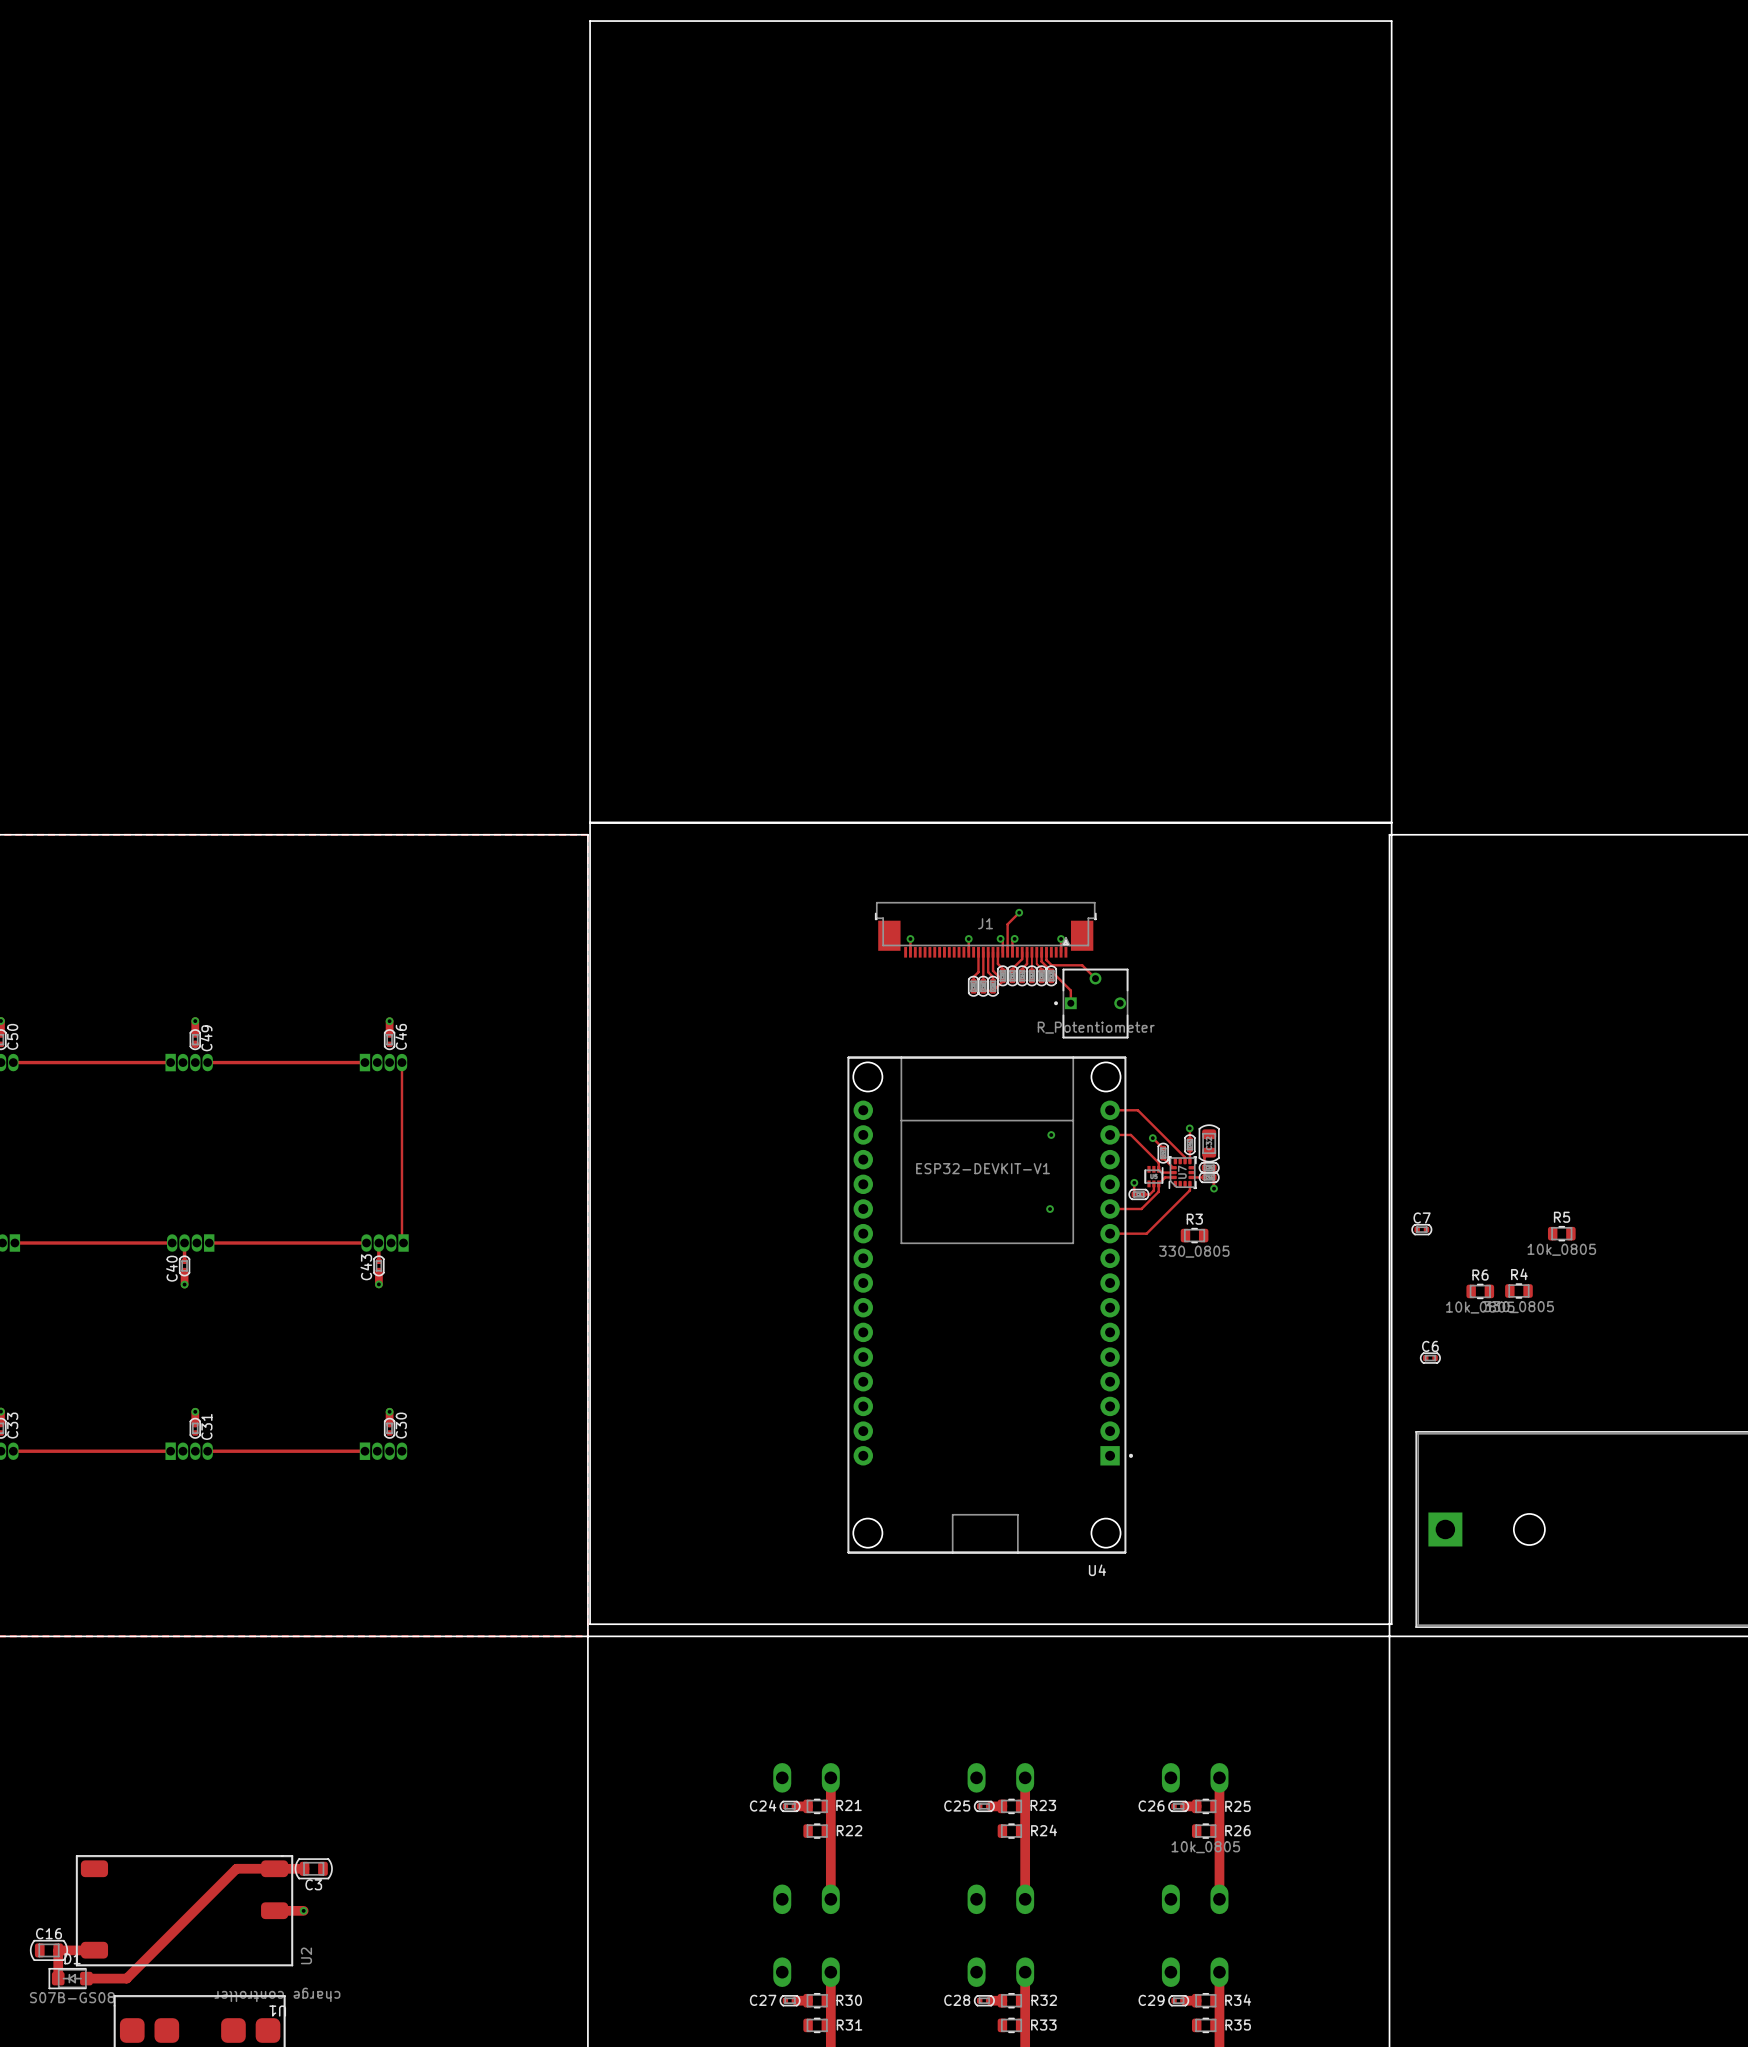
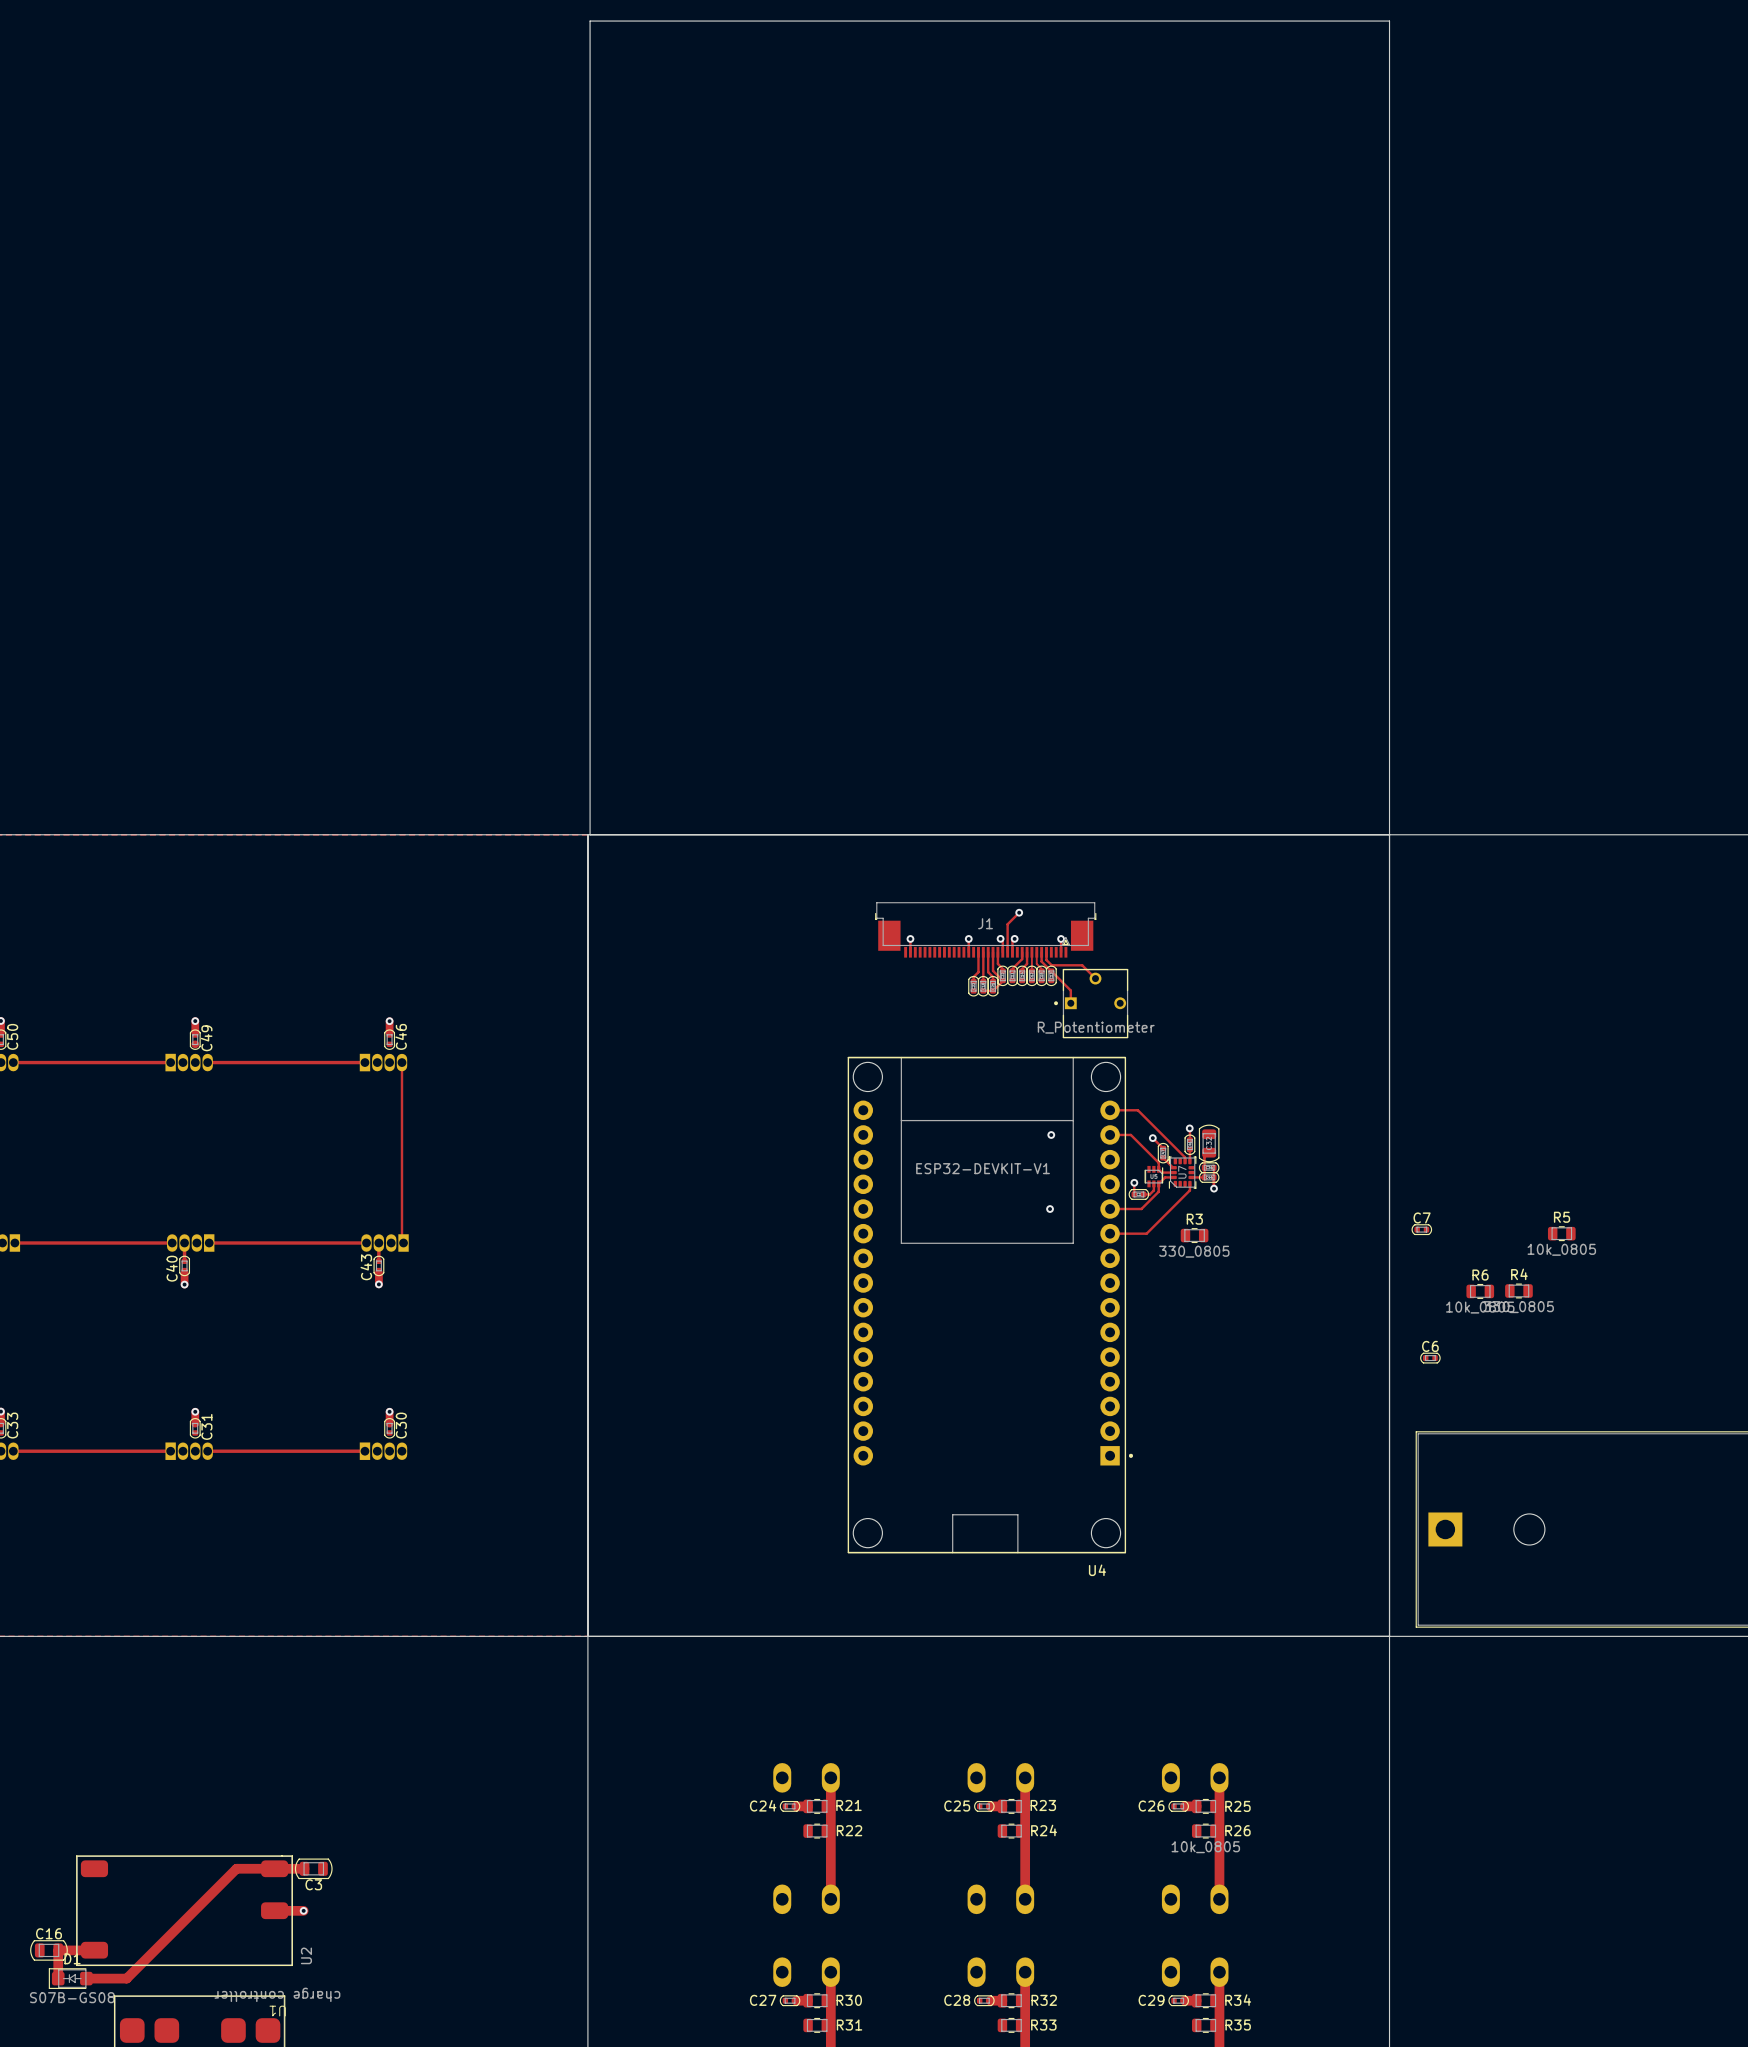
board edge: (1389, 21) (1391, 21) (1391, 1624) (590, 1624) (590, 834) -> (1389, 21) (1389, 834) (587, 834)

